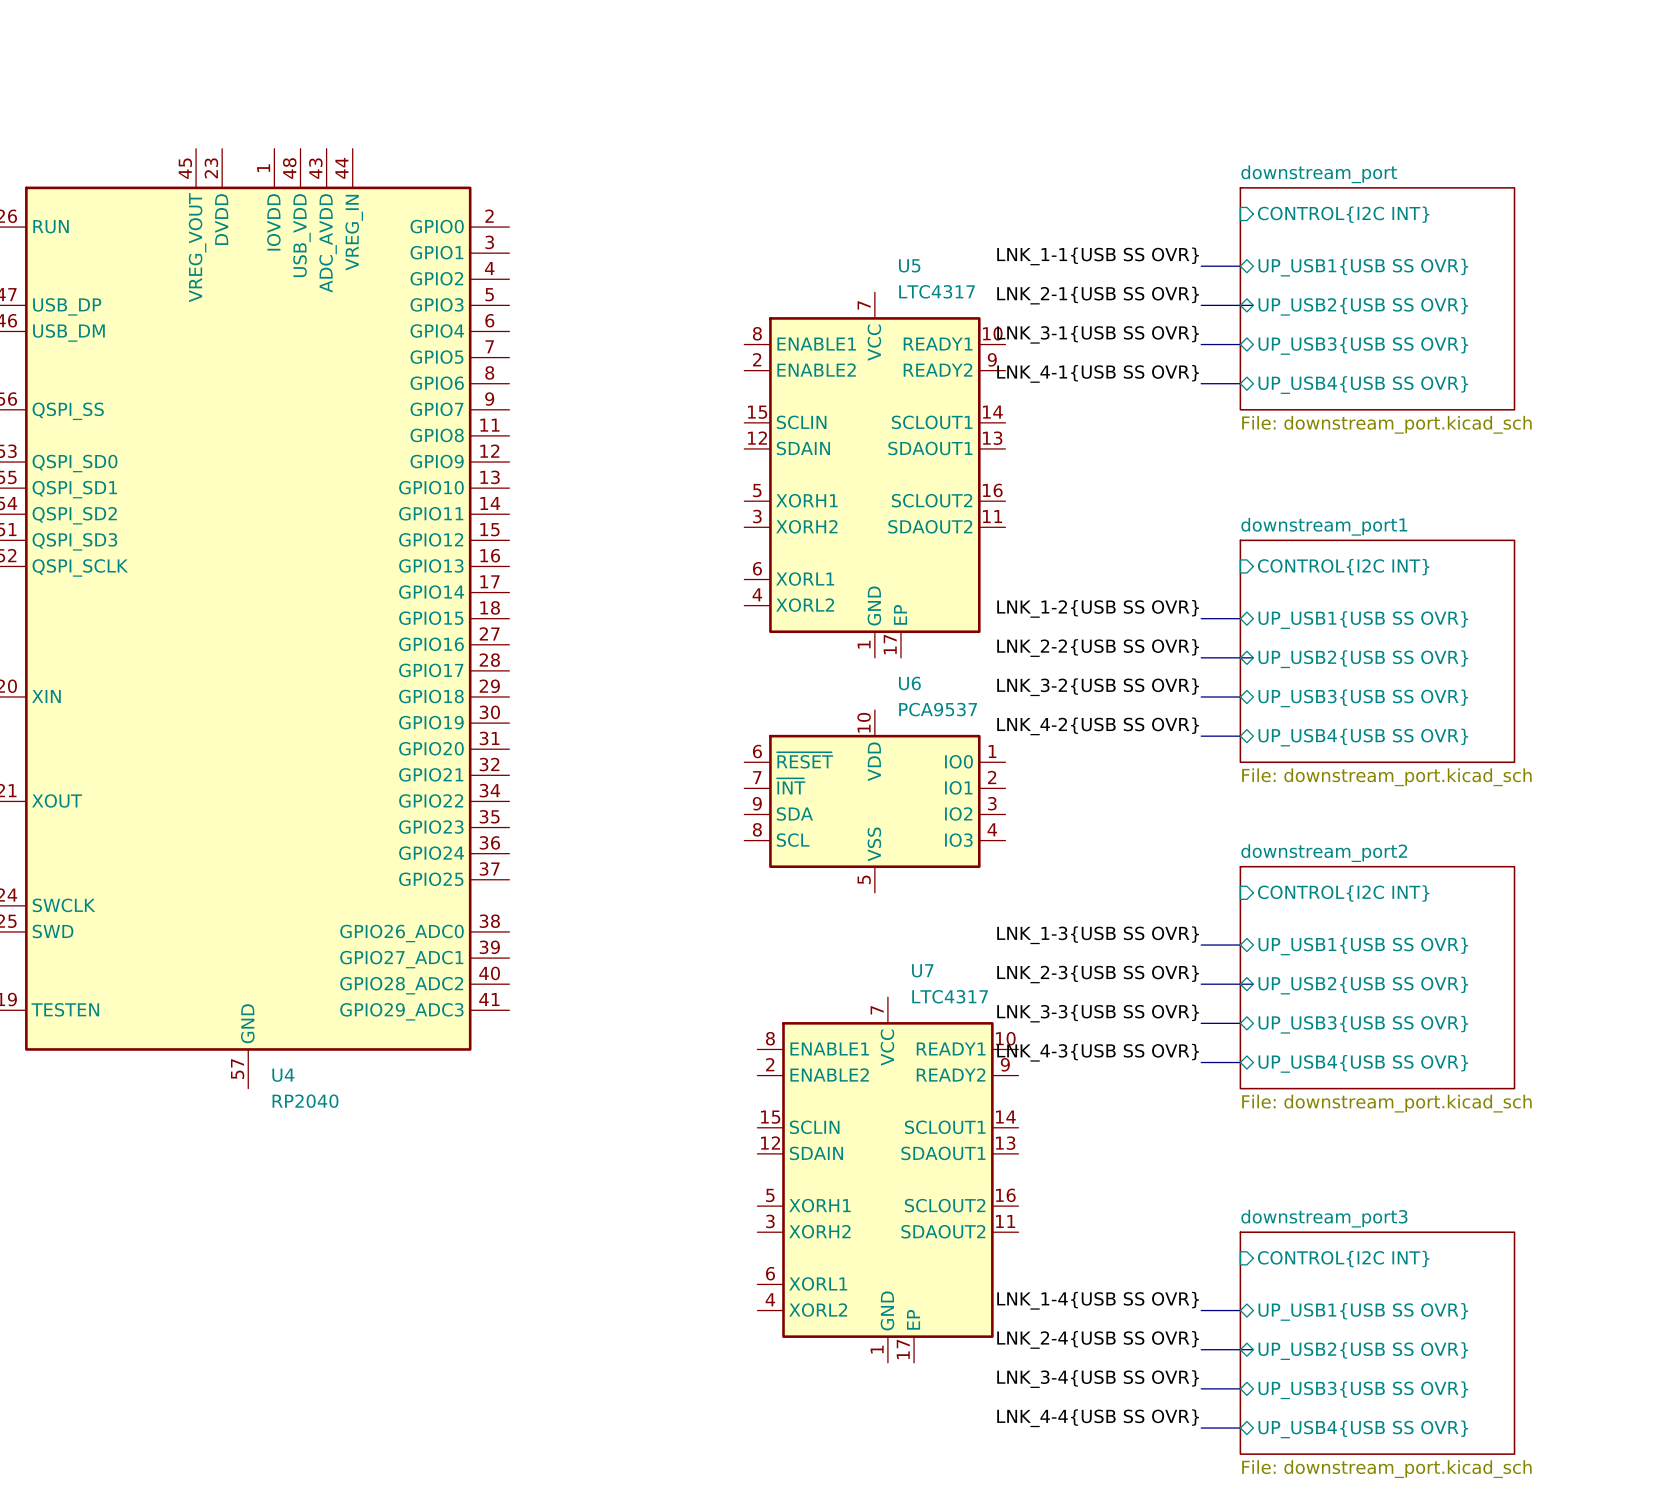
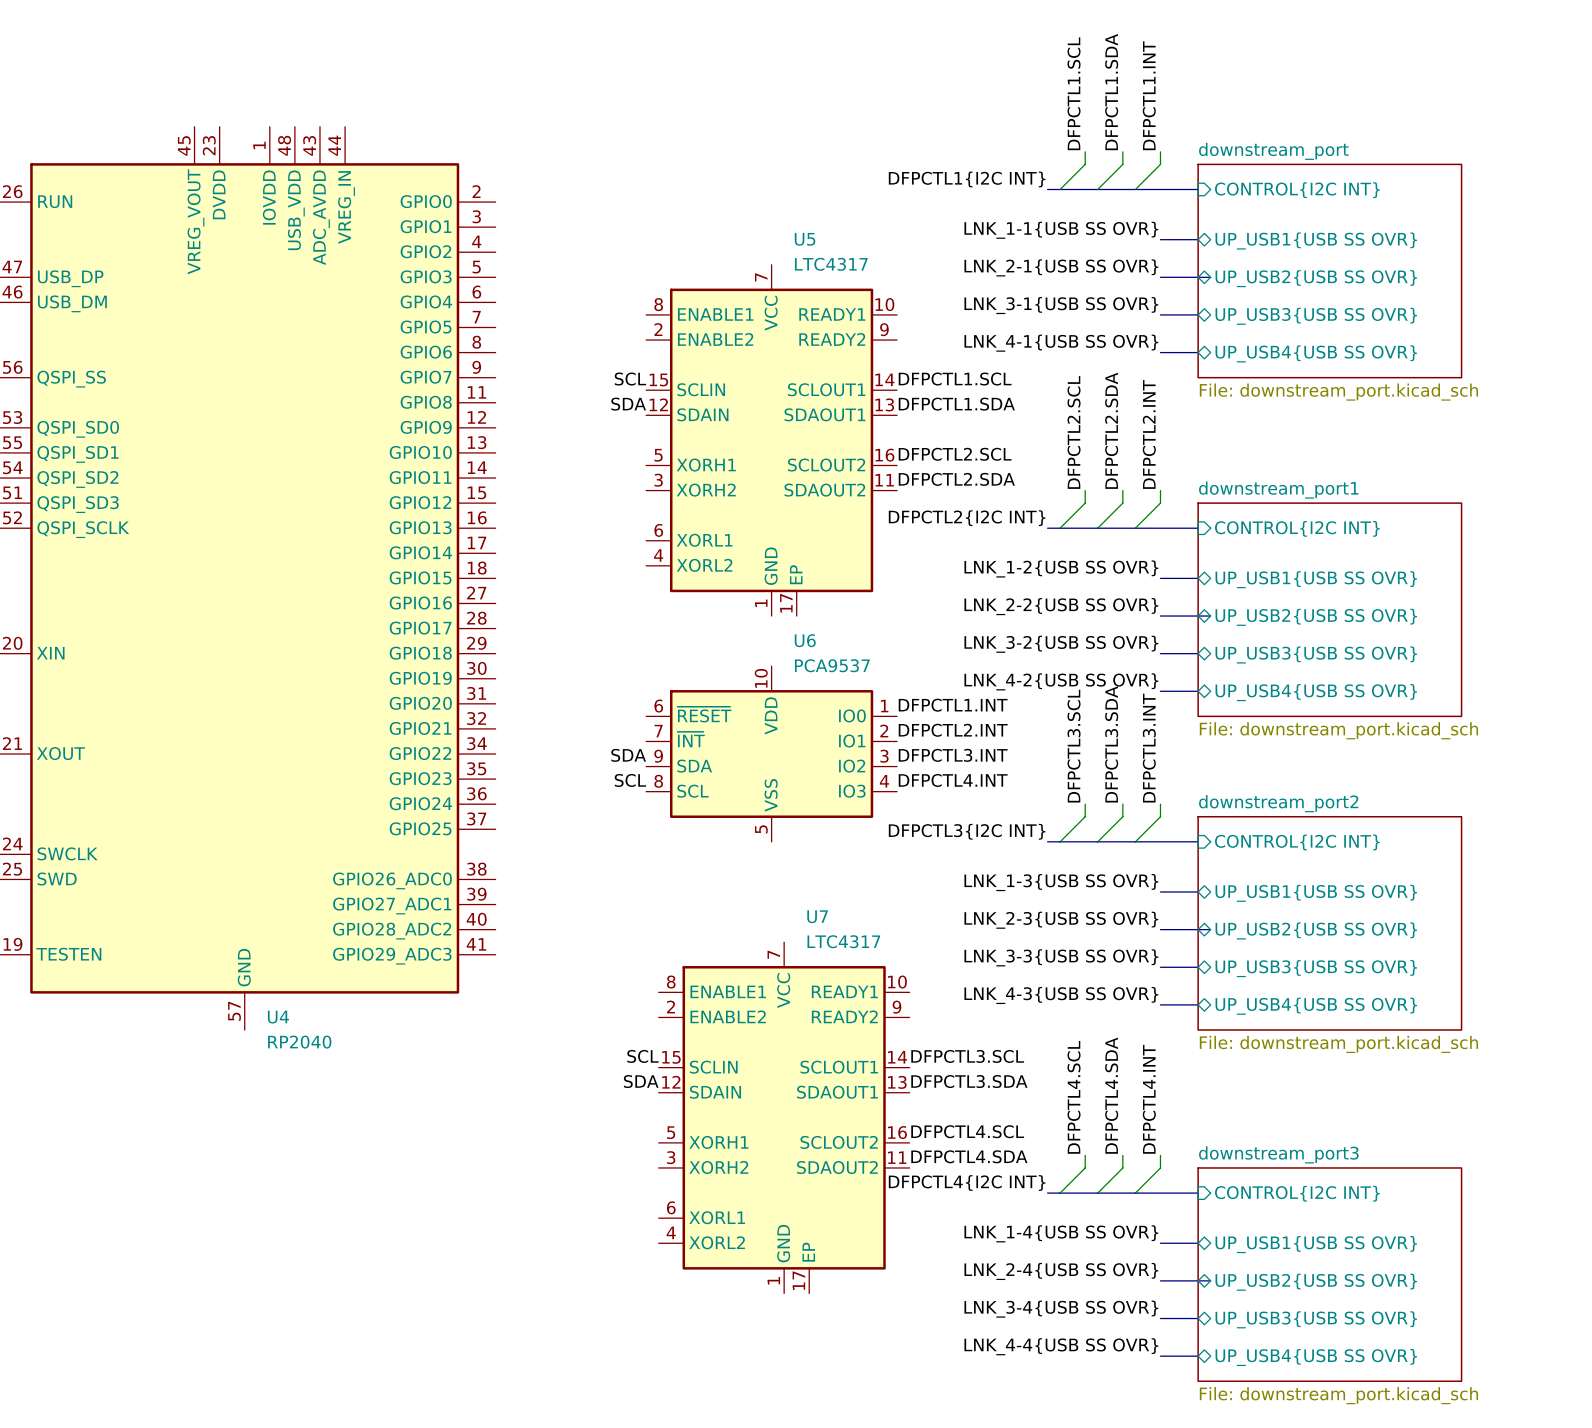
label: none -> DFPCTL1.SDA (1111, 92)
label: none -> DFPCTL1.SCL (1074, 93)
label: none -> DFPCTL1.INT (1149, 95)
wire: none -> (1085, 151) (1085, 164) (1060, 189)
wire: none -> (1122, 151) (1122, 164) (1097, 189)
wire: none -> (1160, 151) (1160, 164) (1135, 189)
label: none -> DFPCTL1{I2C INT} (967, 179)
bus: none -> (1047, 189) (1198, 189)
label: none -> SCL (630, 379)
label: none -> DFPCTL1.SCL (955, 379)
label: none -> SDA (628, 404)
label: none -> DFPCTL1.SDA (956, 404)
label: none -> DFPCTL2.SDA (1111, 430)
label: none -> DFPCTL2.SCL (1074, 432)
label: none -> DFPCTL2.INT (1149, 434)
U5 position: (874, 475) -> (771, 440)
label: none -> DFPCTL2.SCL (955, 454)
label: none -> DFPCTL2.SDA (956, 479)
wire: none -> (1085, 490) (1085, 503) (1060, 528)
wire: none -> (1122, 490) (1122, 503) (1097, 528)
wire: none -> (1160, 490) (1160, 503) (1135, 528)
label: none -> DFPCTL2{I2C INT} (967, 518)
bus: none -> (1047, 528) (1198, 528)
label: none -> DFPCTL1.INT (953, 705)
label: none -> DFPCTL2.INT (953, 730)
label: none -> DFPCTL3.SDA (1111, 744)
label: none -> DFPCTL3.SCL (1074, 746)
label: none -> DFPCTL3.INT (1149, 748)
U6 position: (874, 801) -> (771, 754)
label: none -> SDA (628, 755)
label: none -> DFPCTL3.INT (953, 755)
label: none -> SCL (630, 780)
label: none -> DFPCTL4.INT (953, 780)
wire: none -> (1085, 804) (1085, 816) (1060, 841)
wire: none -> (1122, 804) (1122, 816) (1097, 841)
wire: none -> (1160, 804) (1160, 816) (1135, 841)
label: none -> DFPCTL3{I2C INT} (967, 831)
bus: none -> (1047, 841) (1198, 841)
label: none -> SCL (642, 1056)
label: none -> DFPCTL3.SCL (967, 1056)
label: none -> SDA (641, 1081)
label: none -> DFPCTL3.SDA (969, 1081)
label: none -> DFPCTL4.SDA (1111, 1095)
label: none -> DFPCTL4.SCL (1074, 1097)
label: none -> DFPCTL4.INT (1149, 1099)
U7 position: (887, 1180) -> (784, 1117)
label: none -> DFPCTL4.SCL (967, 1131)
wire: none -> (1085, 1155) (1085, 1167) (1060, 1193)
wire: none -> (1122, 1155) (1122, 1167) (1097, 1193)
wire: none -> (1160, 1155) (1160, 1167) (1135, 1193)
label: none -> DFPCTL4.SDA (969, 1156)
label: none -> DFPCTL4{I2C INT} (967, 1183)
bus: none -> (1047, 1193) (1198, 1193)

